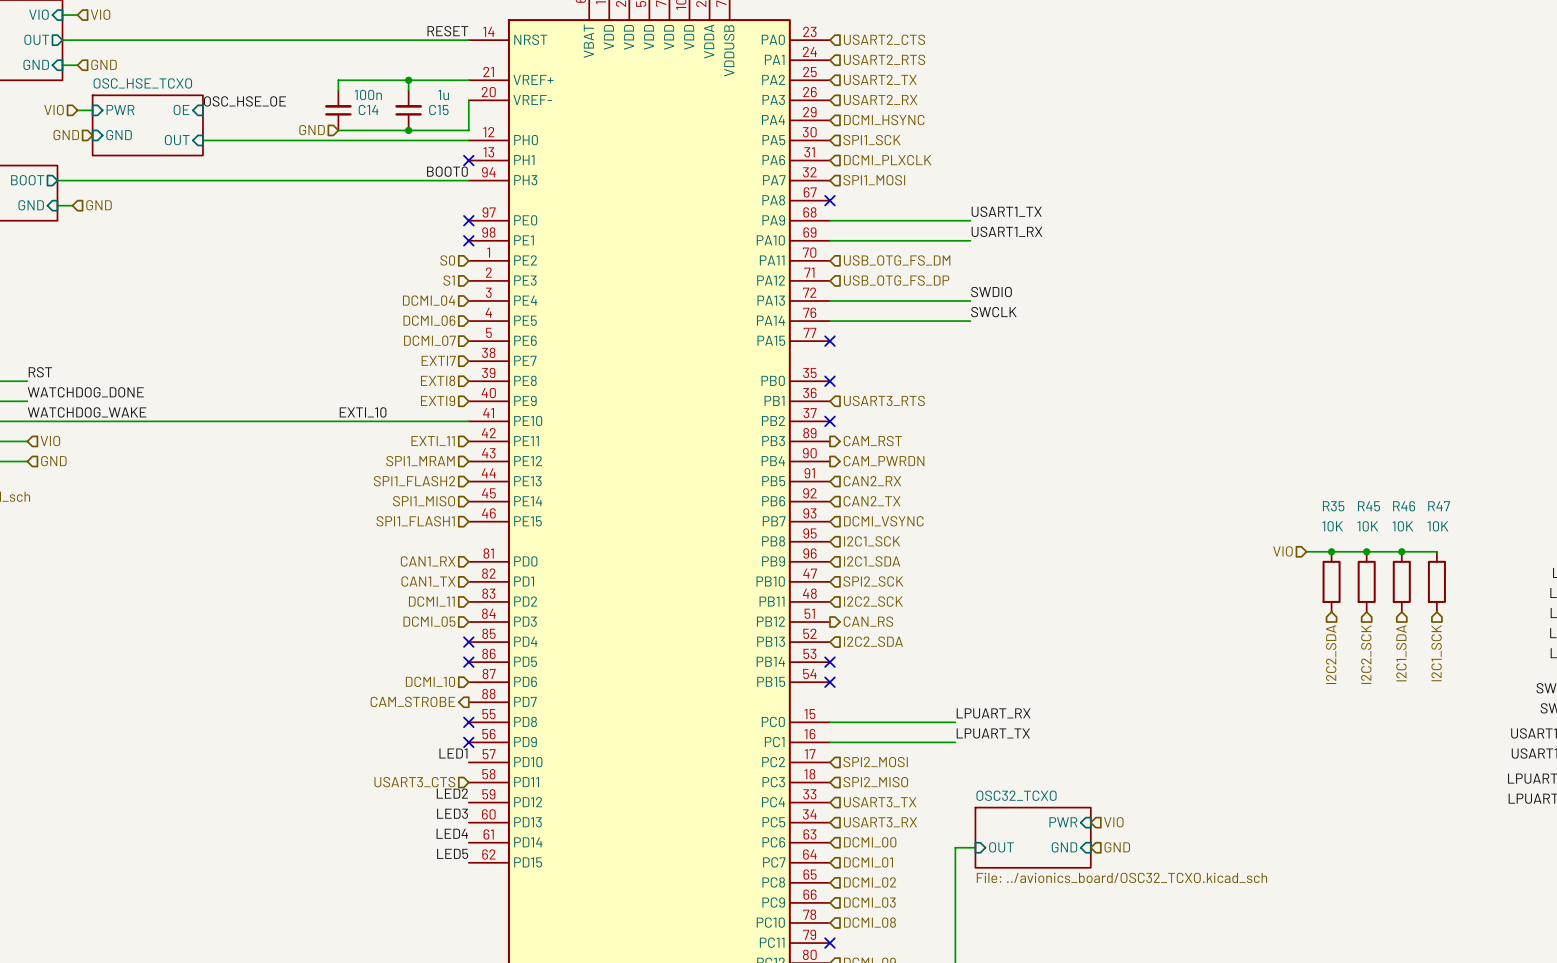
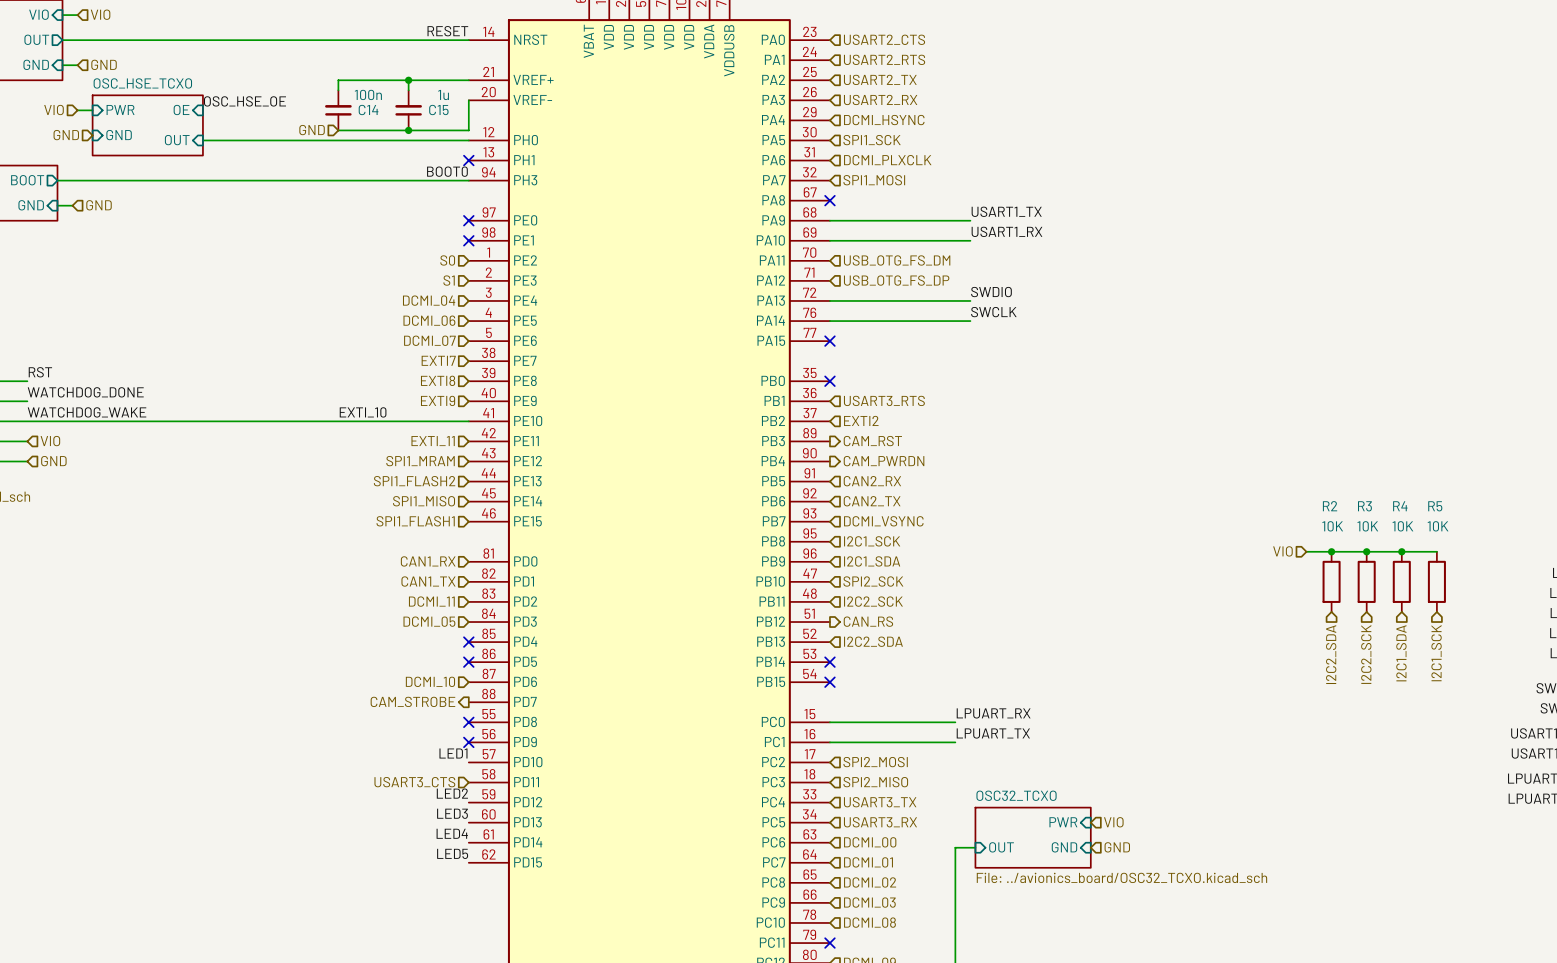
hierarchical label: none -> EXTI2 (861, 420)
no-connect mark: (829, 421) -> none
R35 name: R35 (1333, 506) -> R2 (1330, 506)
R45 name: R45 (1368, 506) -> R3 (1364, 506)
R46 name: R46 (1404, 506) -> R4 (1400, 506)
R47 name: R47 (1439, 506) -> R5 (1435, 506)

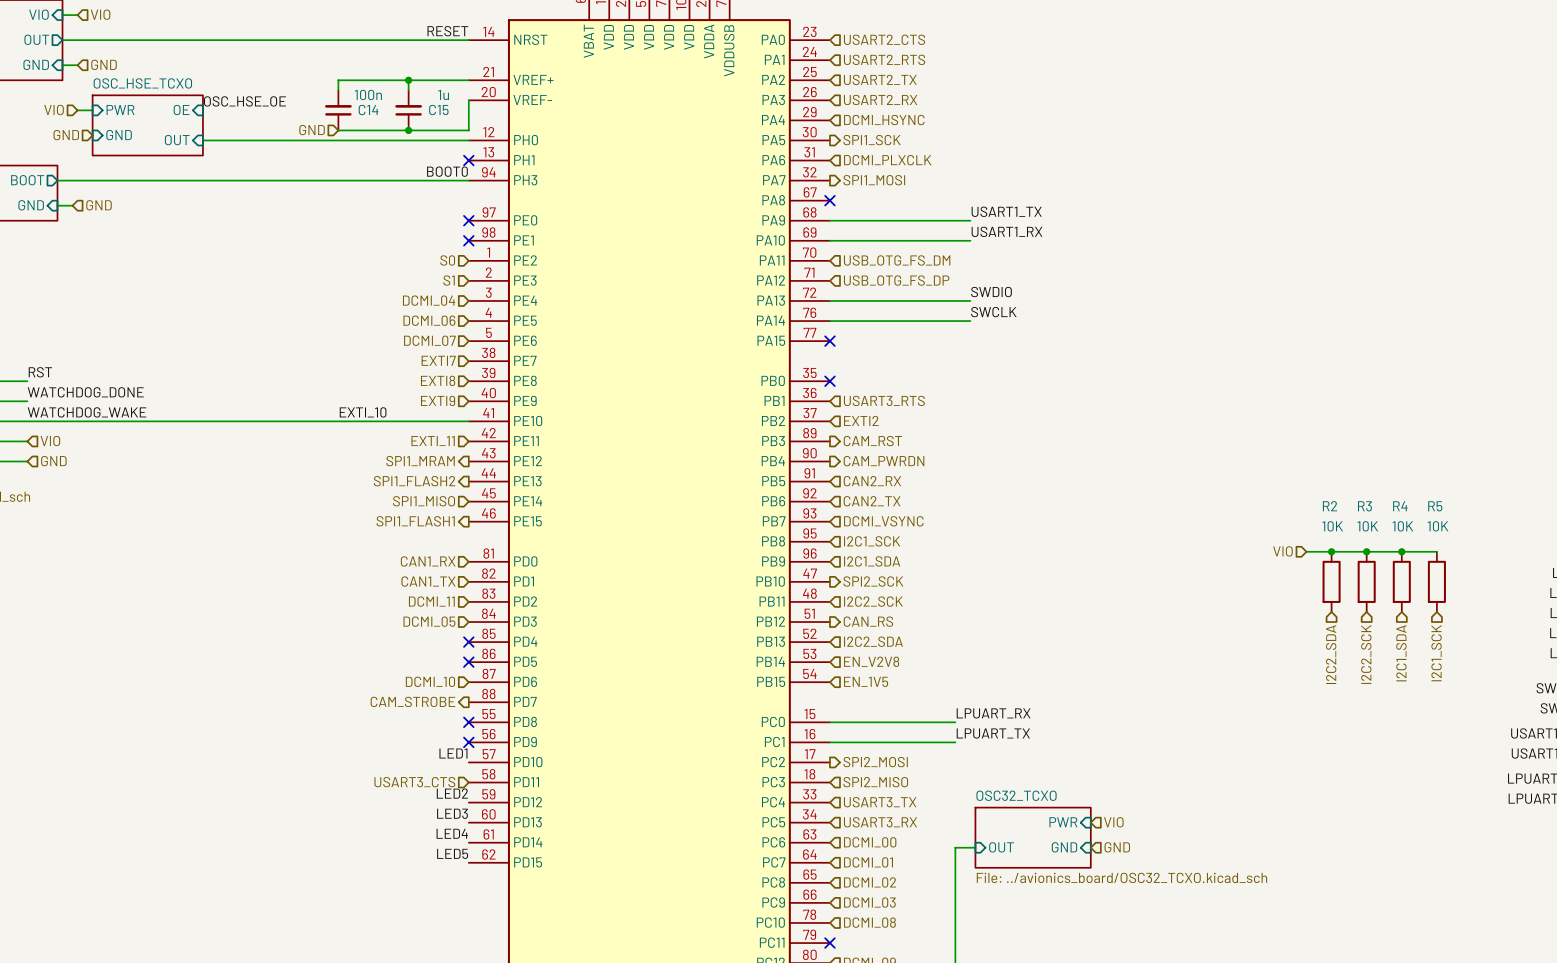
hierarchical label shape: input (872, 140) -> output (872, 140)
hierarchical label shape: input (874, 180) -> output (874, 180)
hierarchical label shape: input (420, 461) -> output (420, 461)
hierarchical label shape: input (414, 481) -> output (414, 481)
hierarchical label shape: input (415, 521) -> output (415, 521)
hierarchical label shape: input (873, 581) -> output (873, 581)
hierarchical label: none -> EN_V2V8 (871, 661)
no-connect mark: (829, 662) -> none
hierarchical label: none -> EN_1V5 (866, 681)
no-connect mark: (829, 682) -> none
hierarchical label shape: input (875, 762) -> output (875, 762)

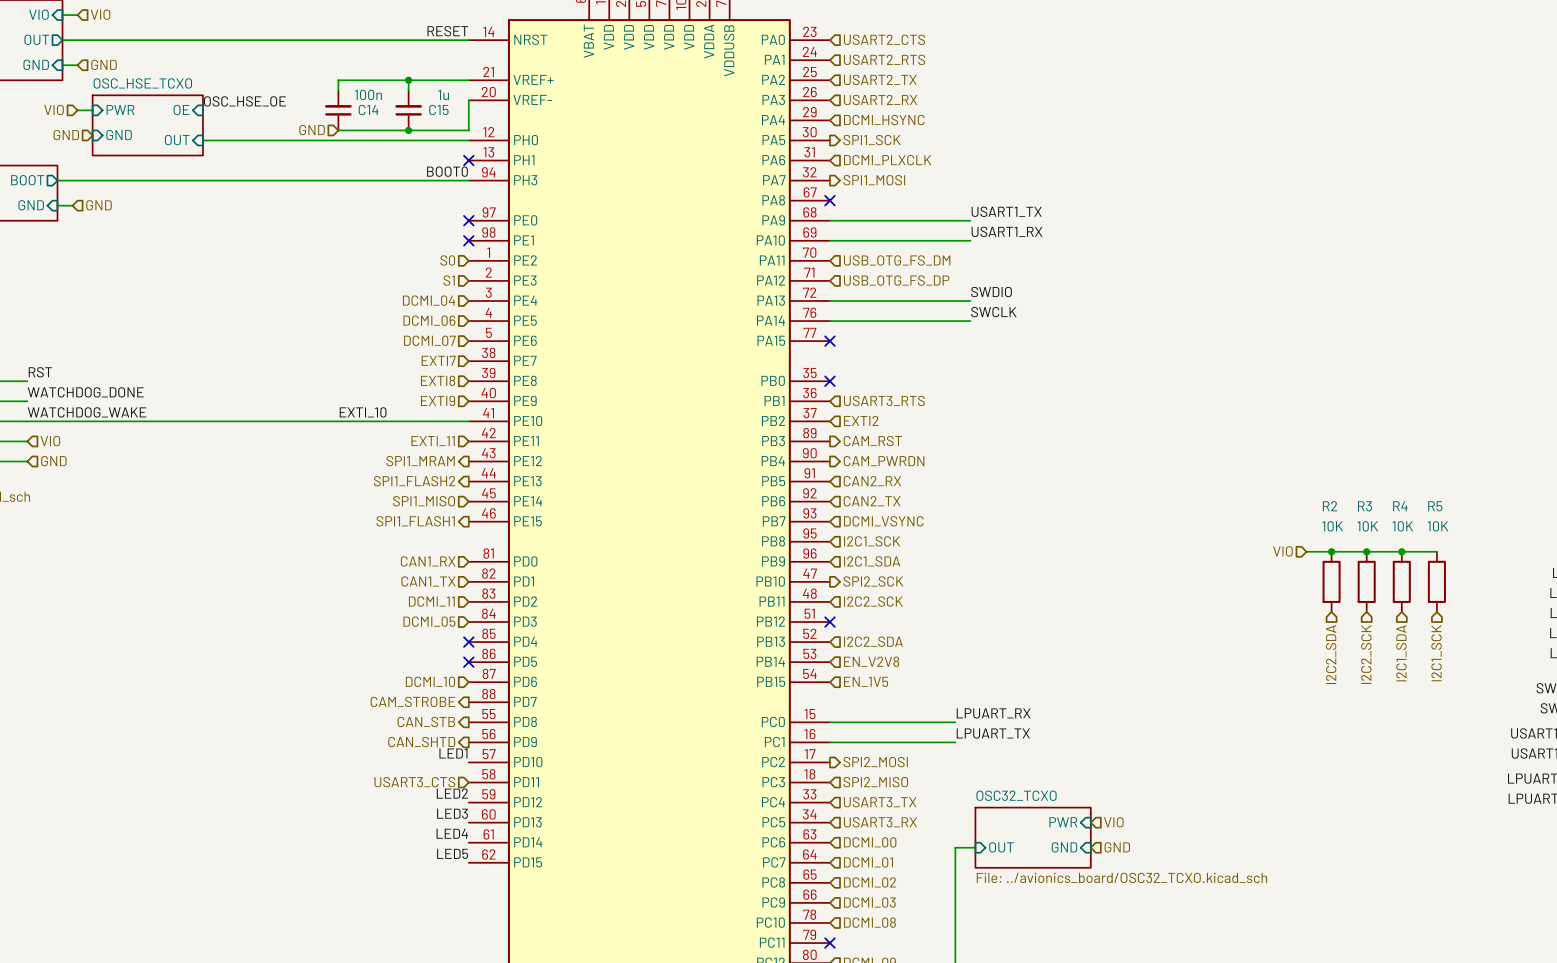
hierarchical label: CAN_RS (868, 621) -> none
no-connect mark: none -> (829, 622)
hierarchical label: none -> CAN_STB (426, 721)
no-connect mark: (468, 722) -> none
hierarchical label: none -> CAN_SHTD (421, 742)
no-connect mark: (468, 742) -> none

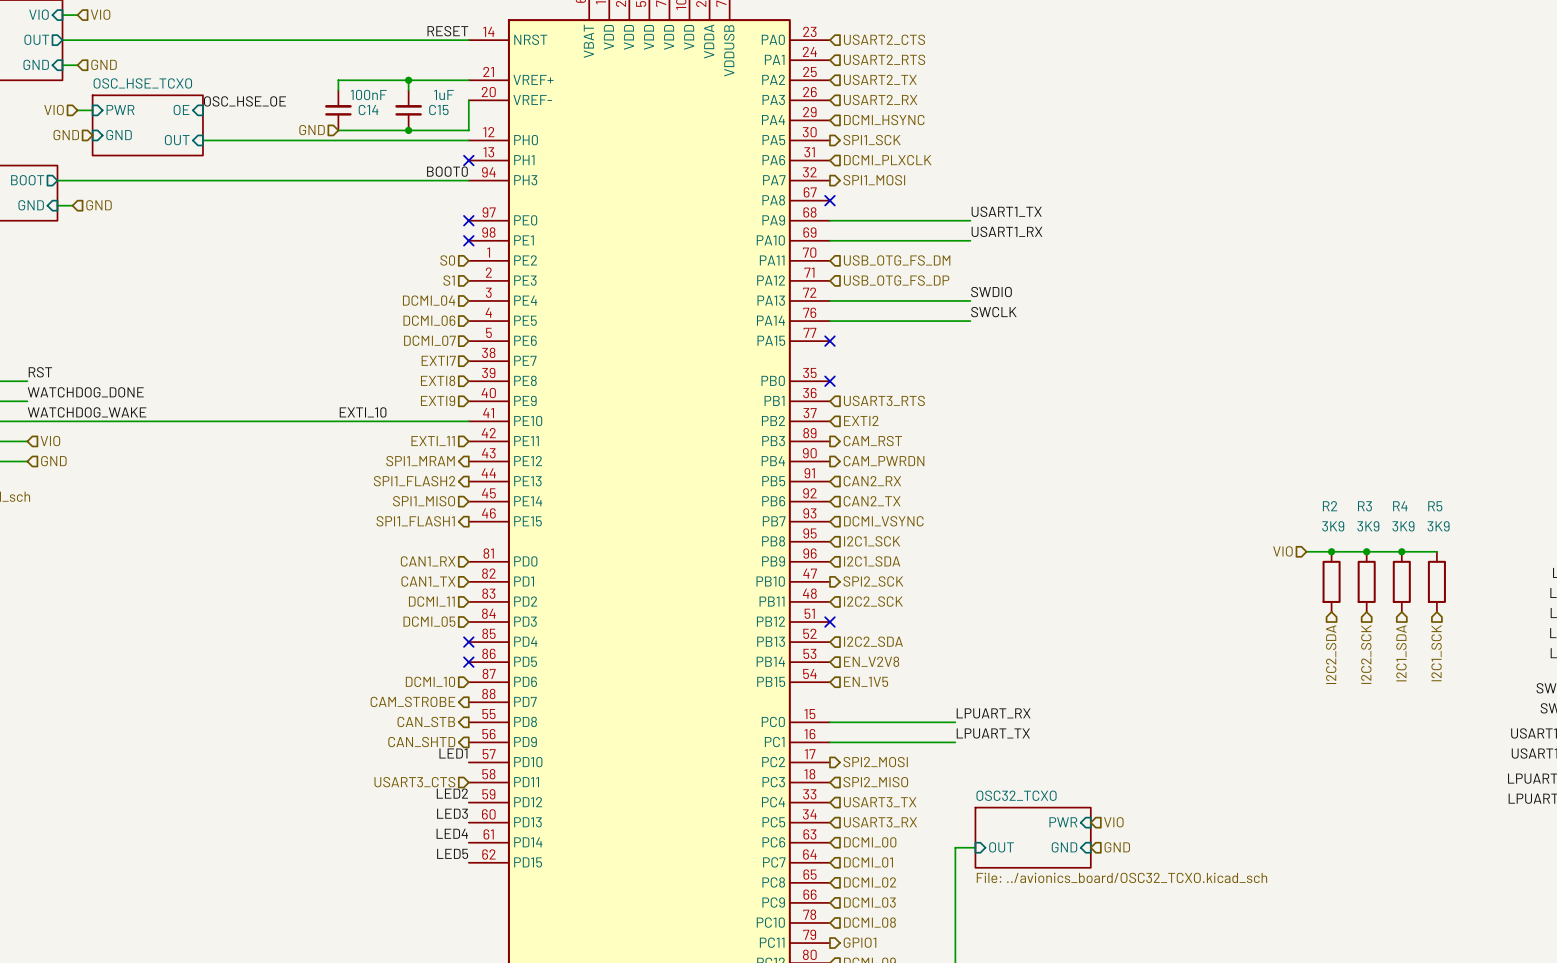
C14 value: 100n (368, 94) -> 100nF (368, 94)
C15 value: 1u (443, 95) -> 1uF (443, 95)
R2 value: 10K (1332, 526) -> 3K9 (1333, 526)
R3 value: 10K (1367, 526) -> 3K9 (1368, 526)
R4 value: 10K (1402, 526) -> 3K9 (1403, 526)
R5 value: 10K (1438, 526) -> 3K9 (1438, 526)
hierarchical label: none -> GPIO1 (860, 942)
no-connect mark: (829, 943) -> none

